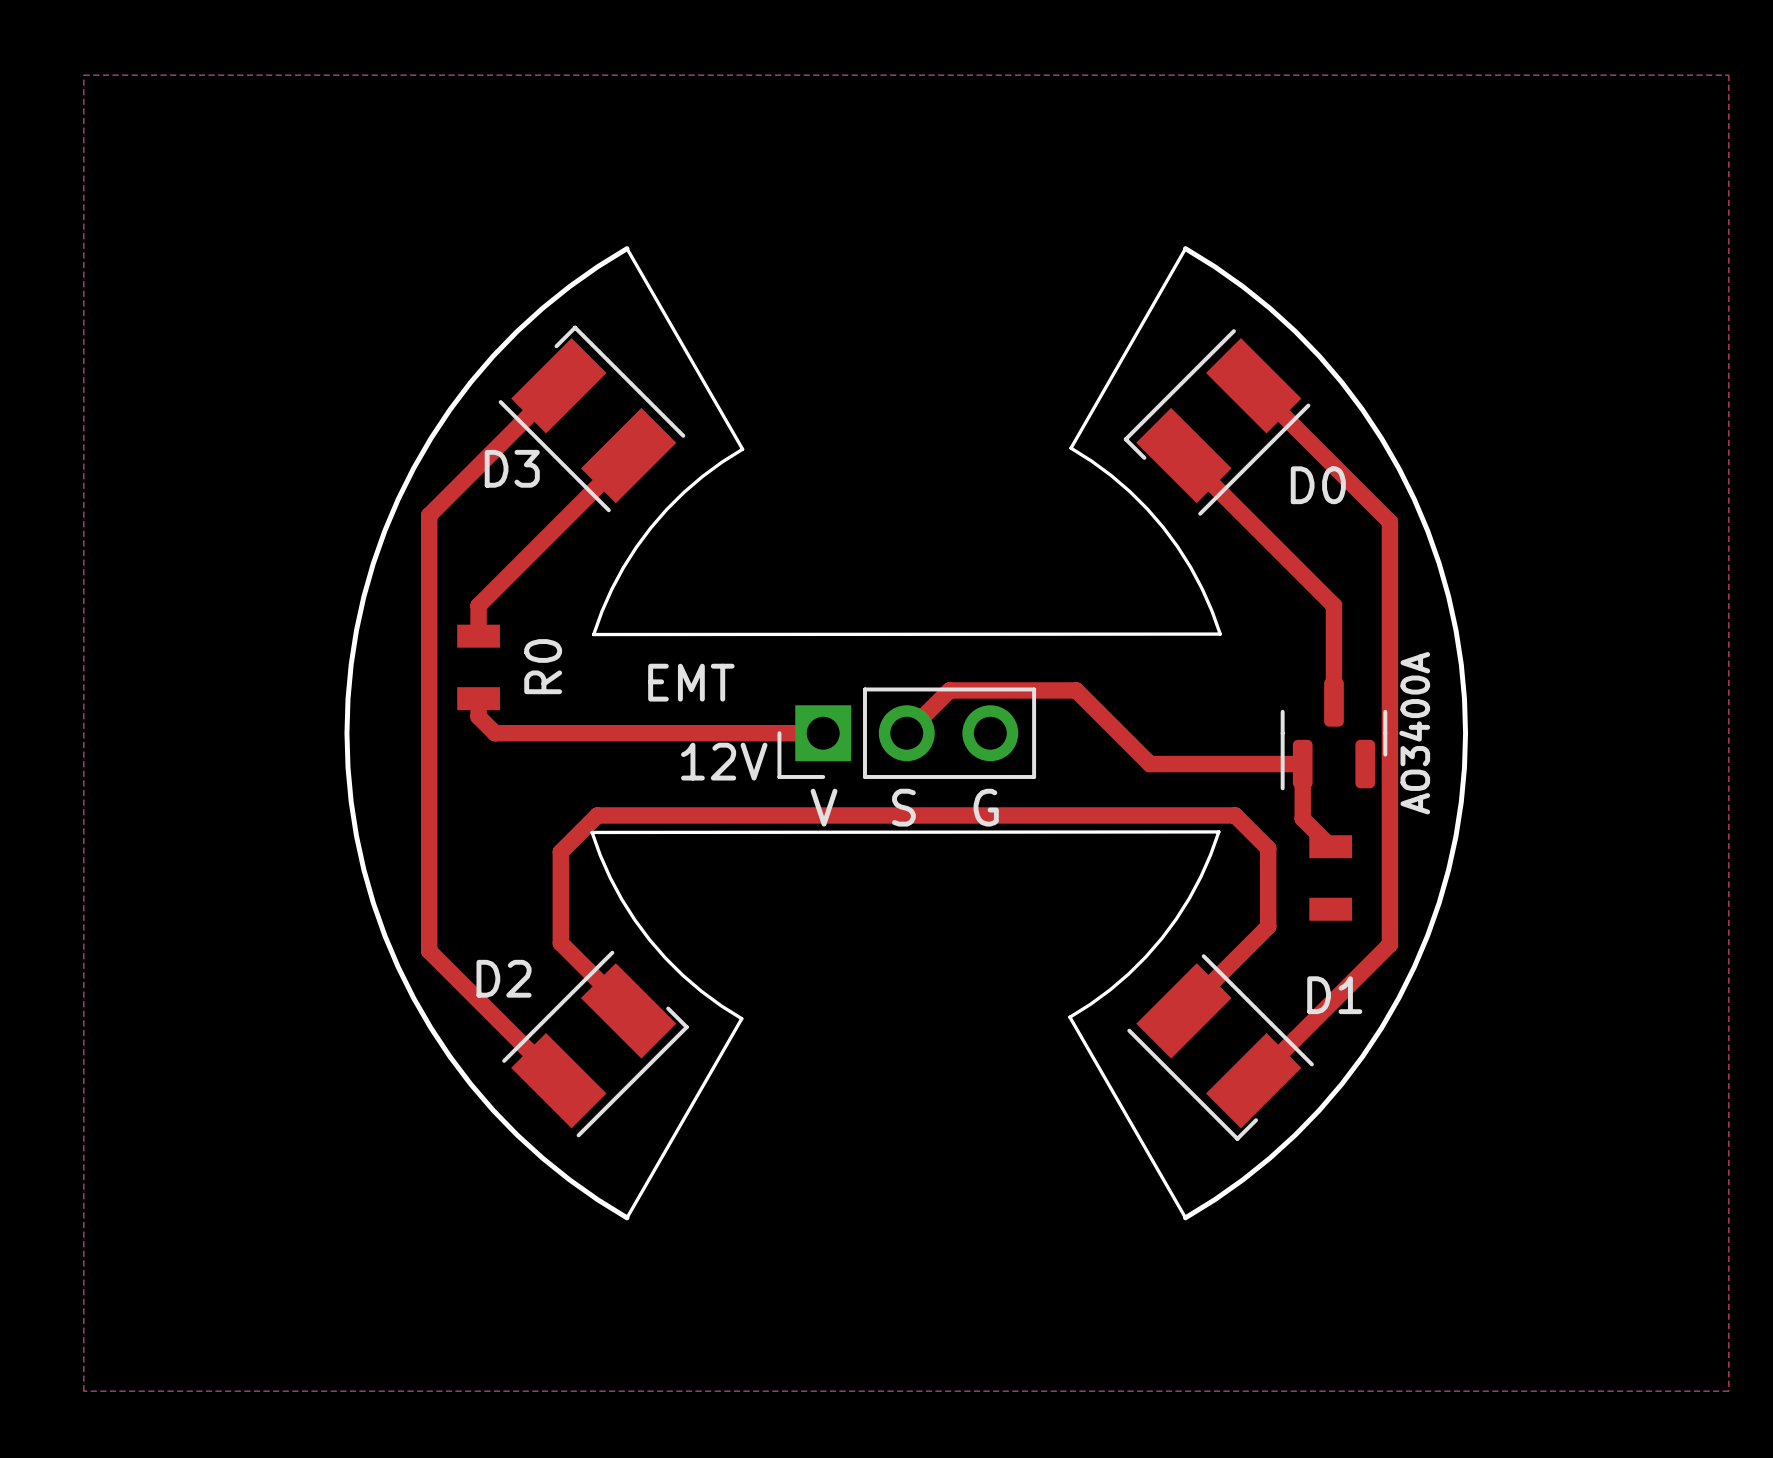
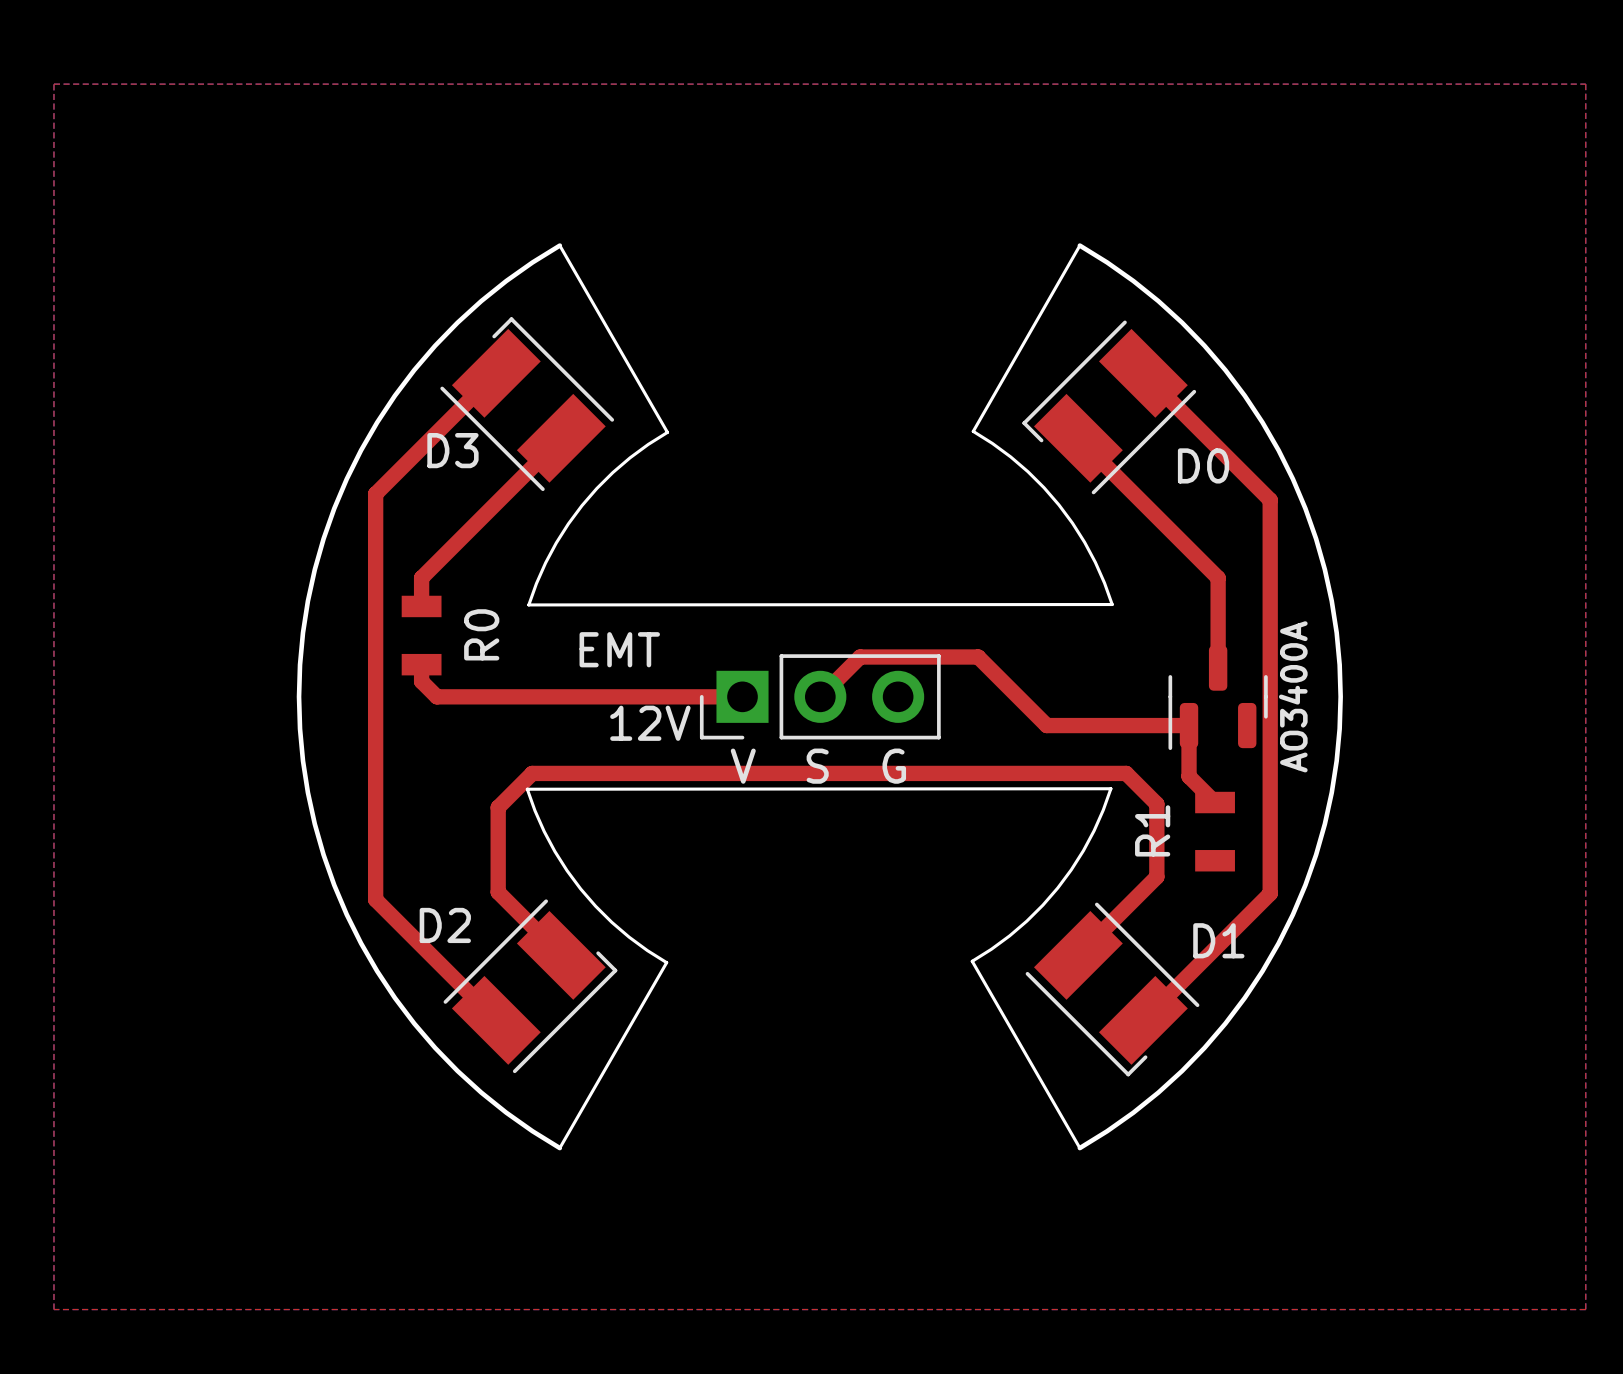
R1 name: none -> R1 (1152, 830)

